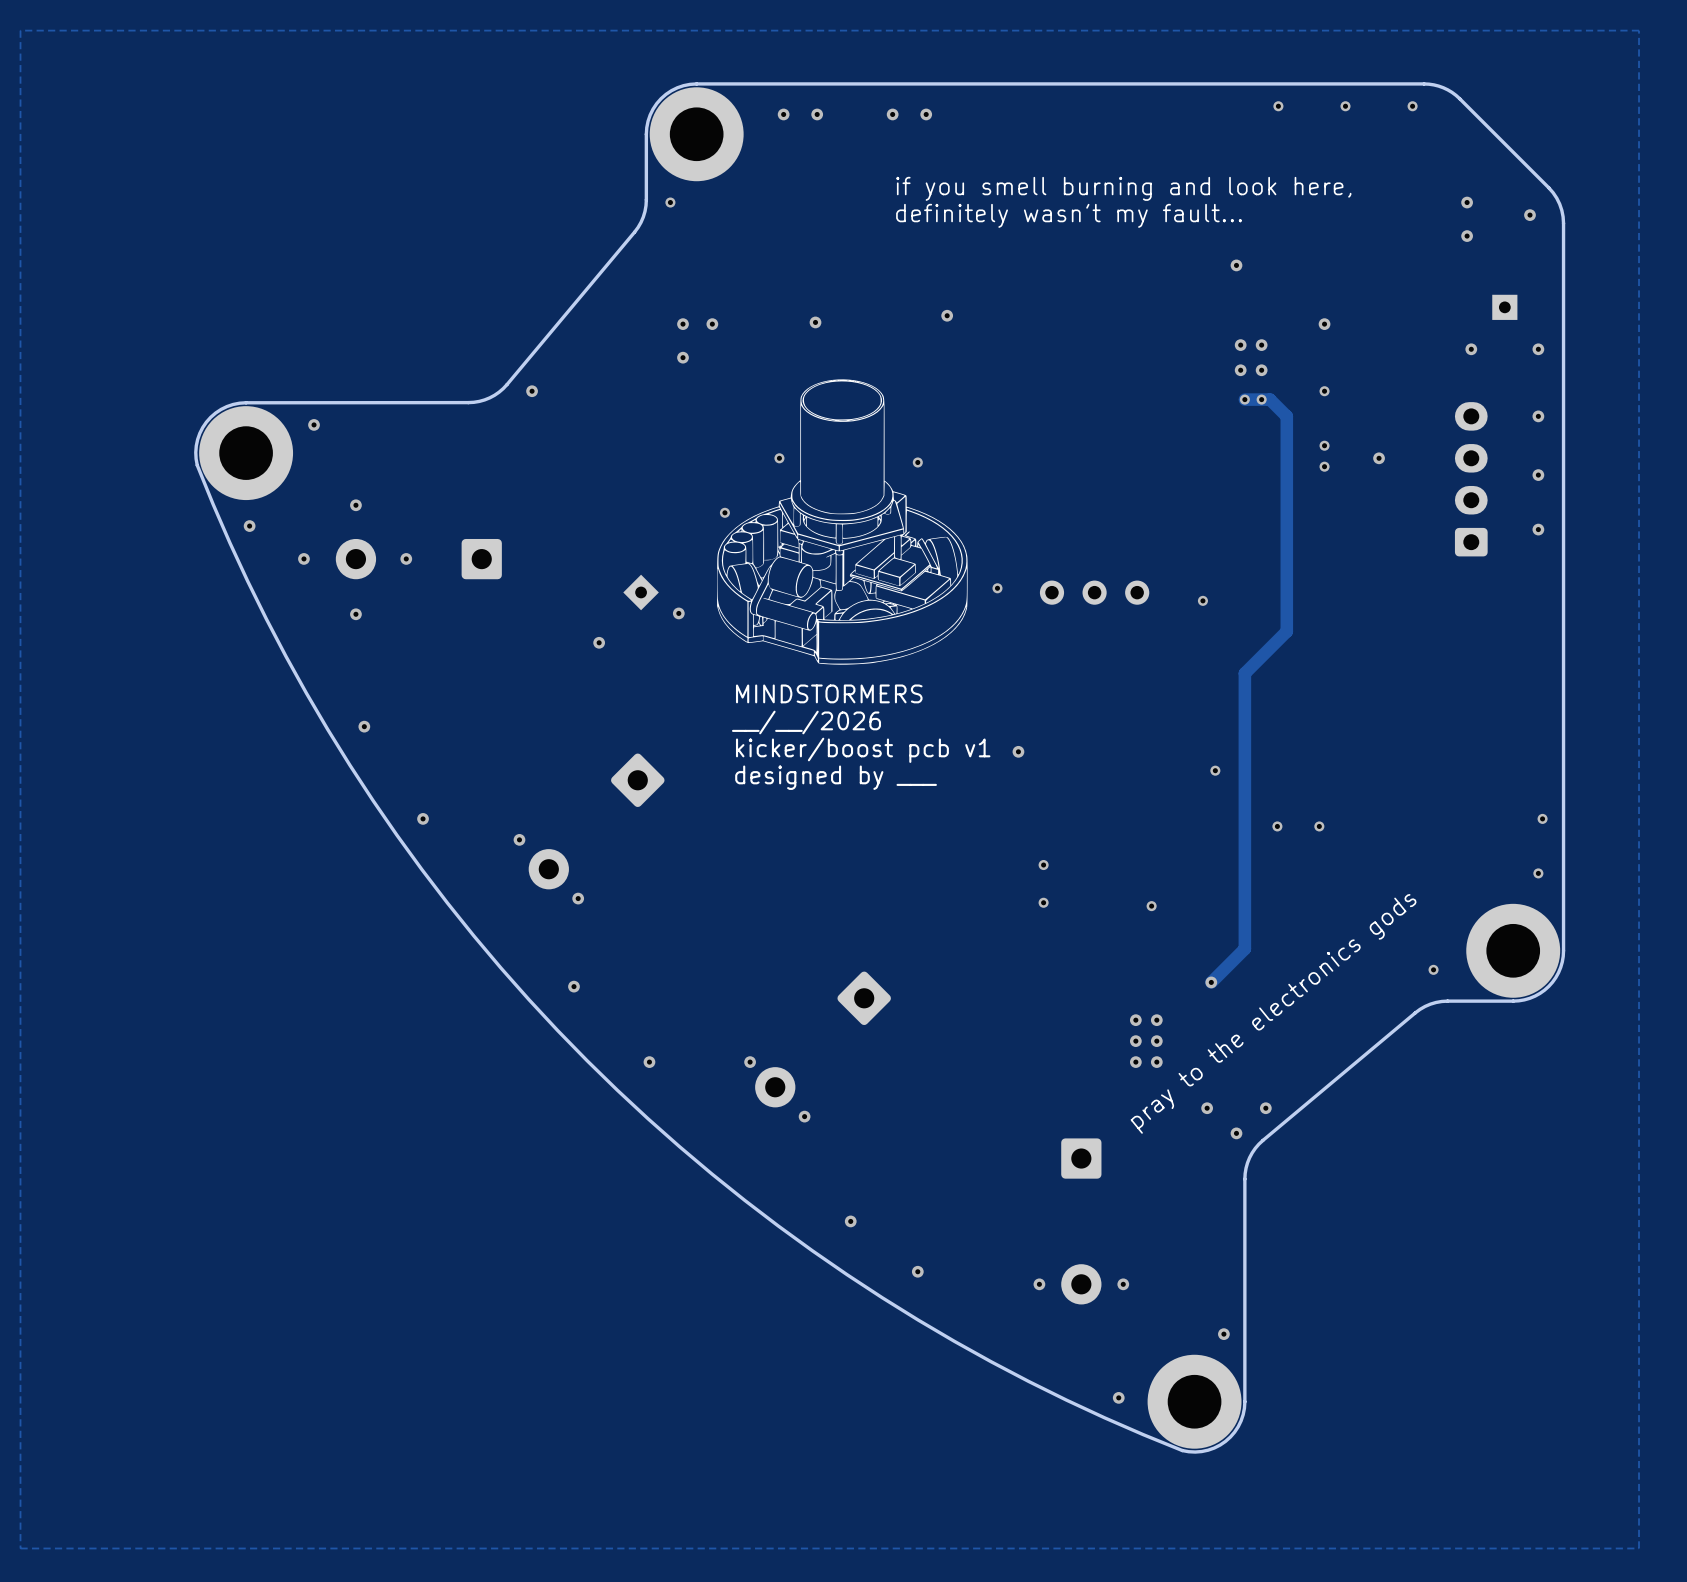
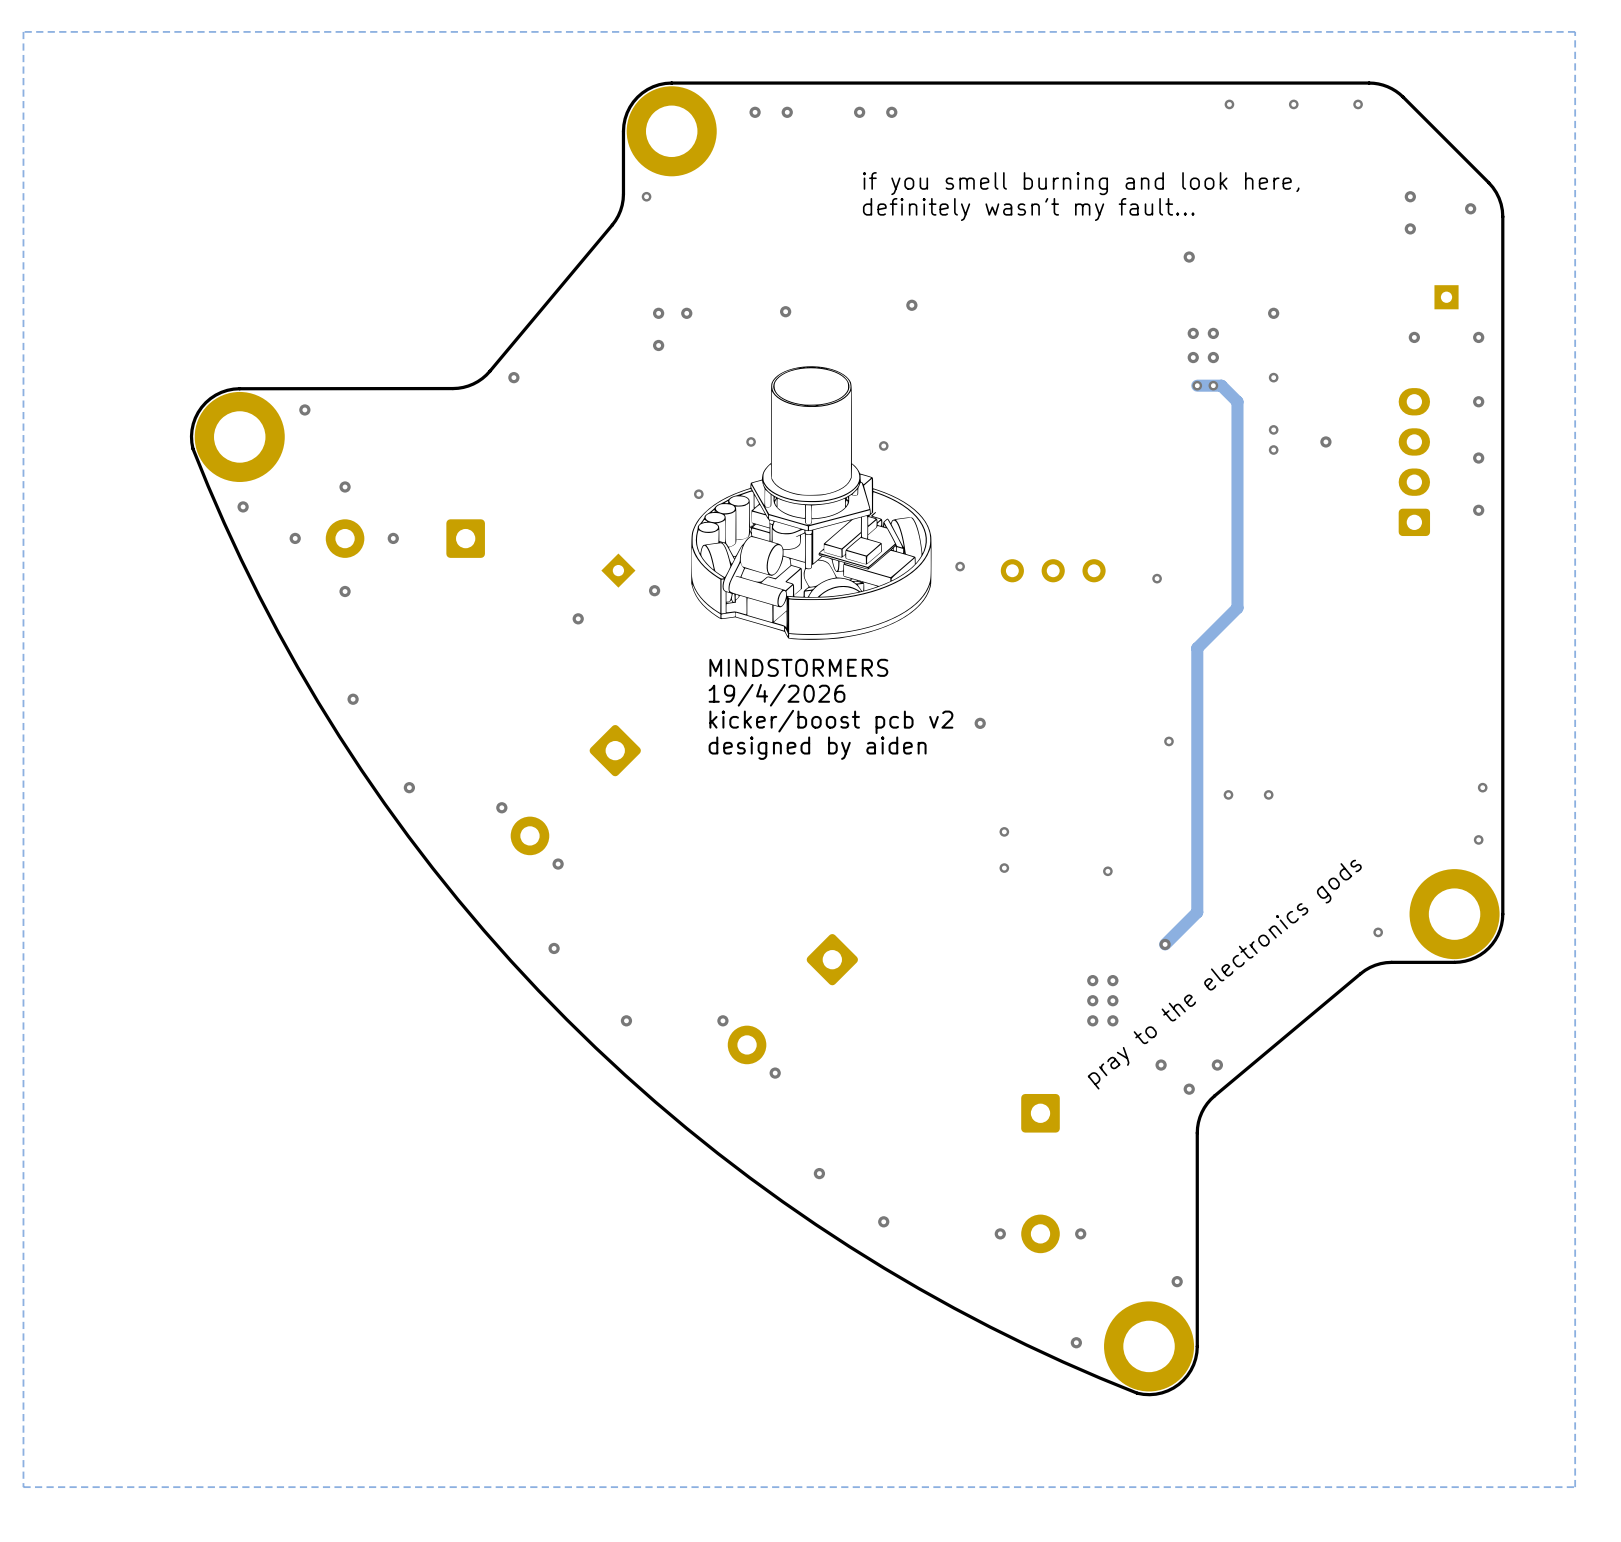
text: __/__/2026 (806, 722) -> 19/4/2026 (777, 695)
text: kicker/boost pcb v1 (863, 750) -> kicker/boost pcb v2 (831, 721)
text: designed by ___ (836, 777) -> designed by aiden (817, 748)

